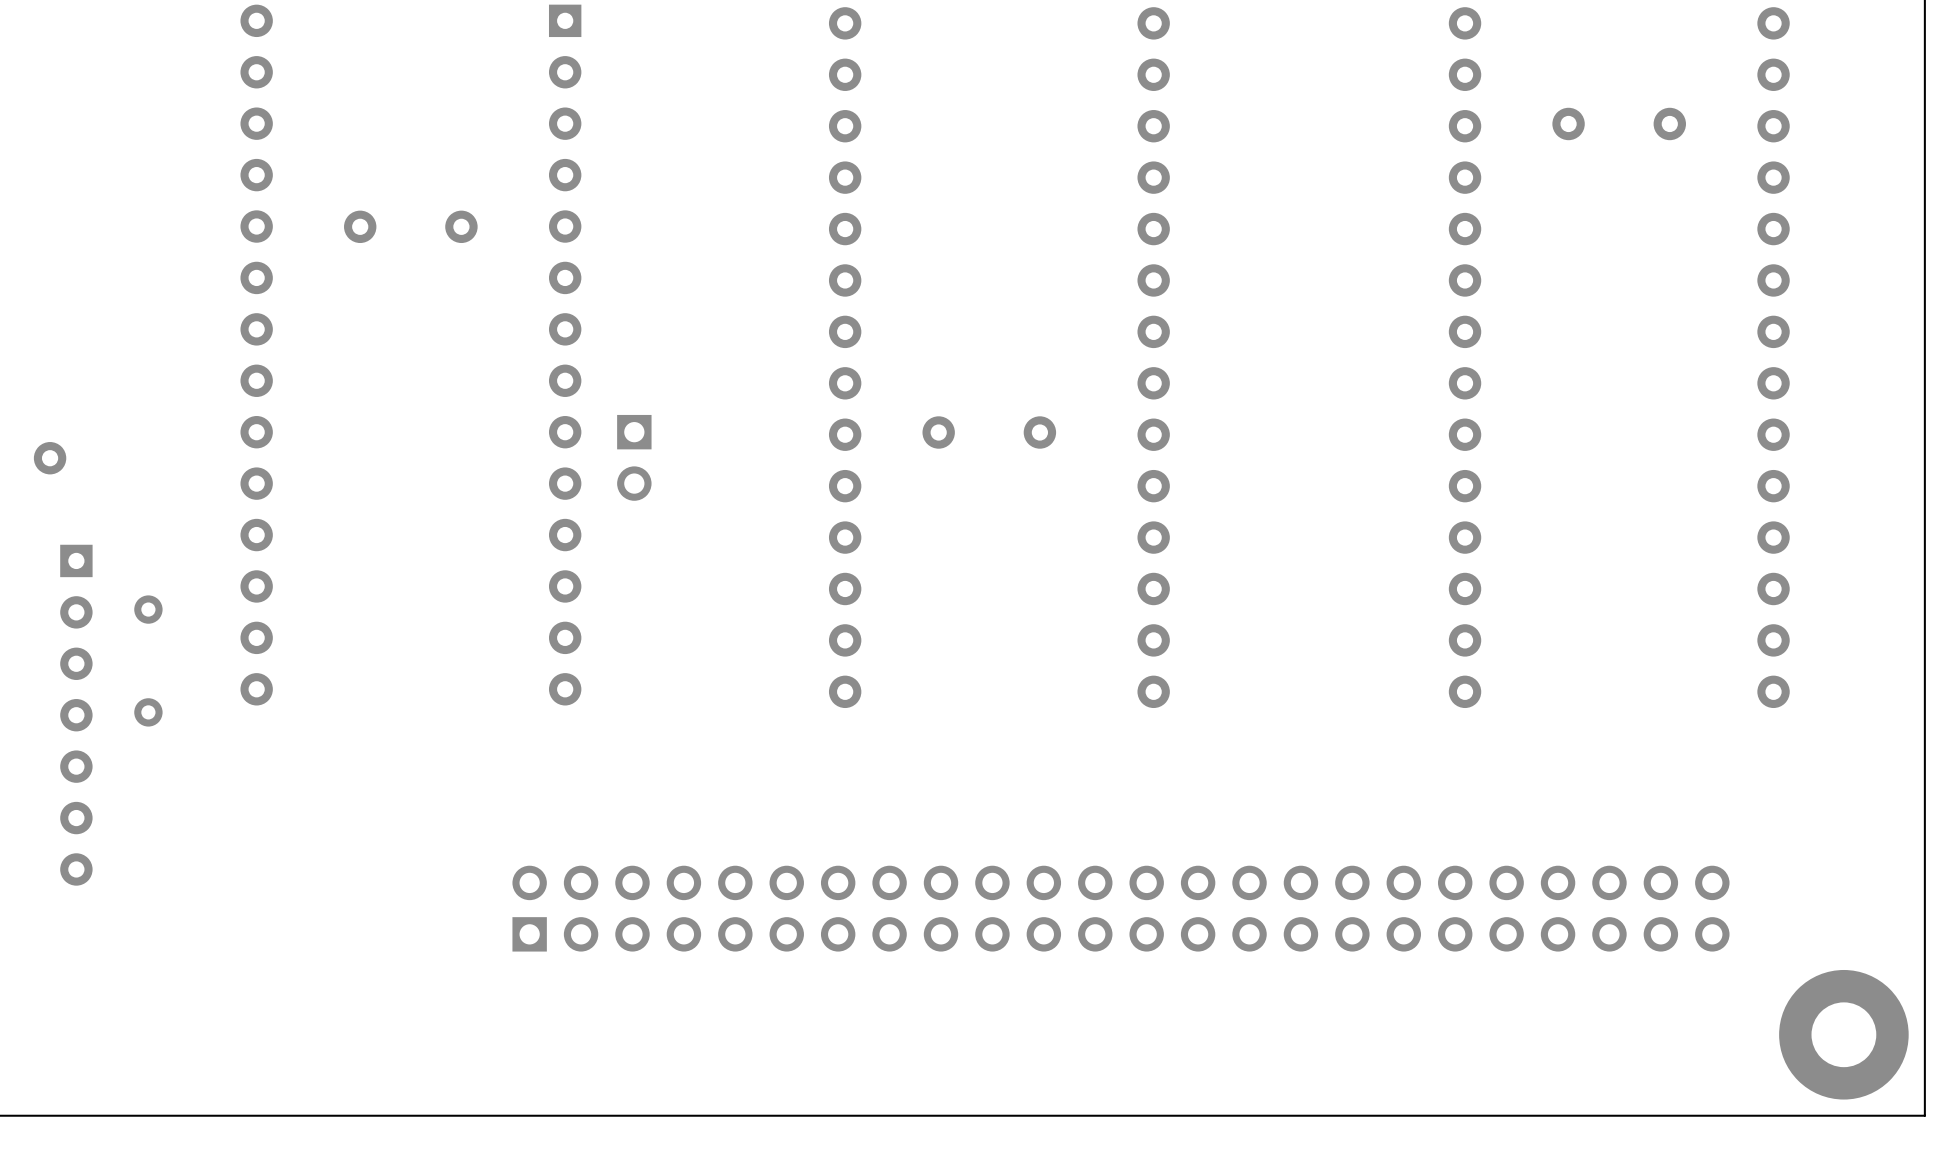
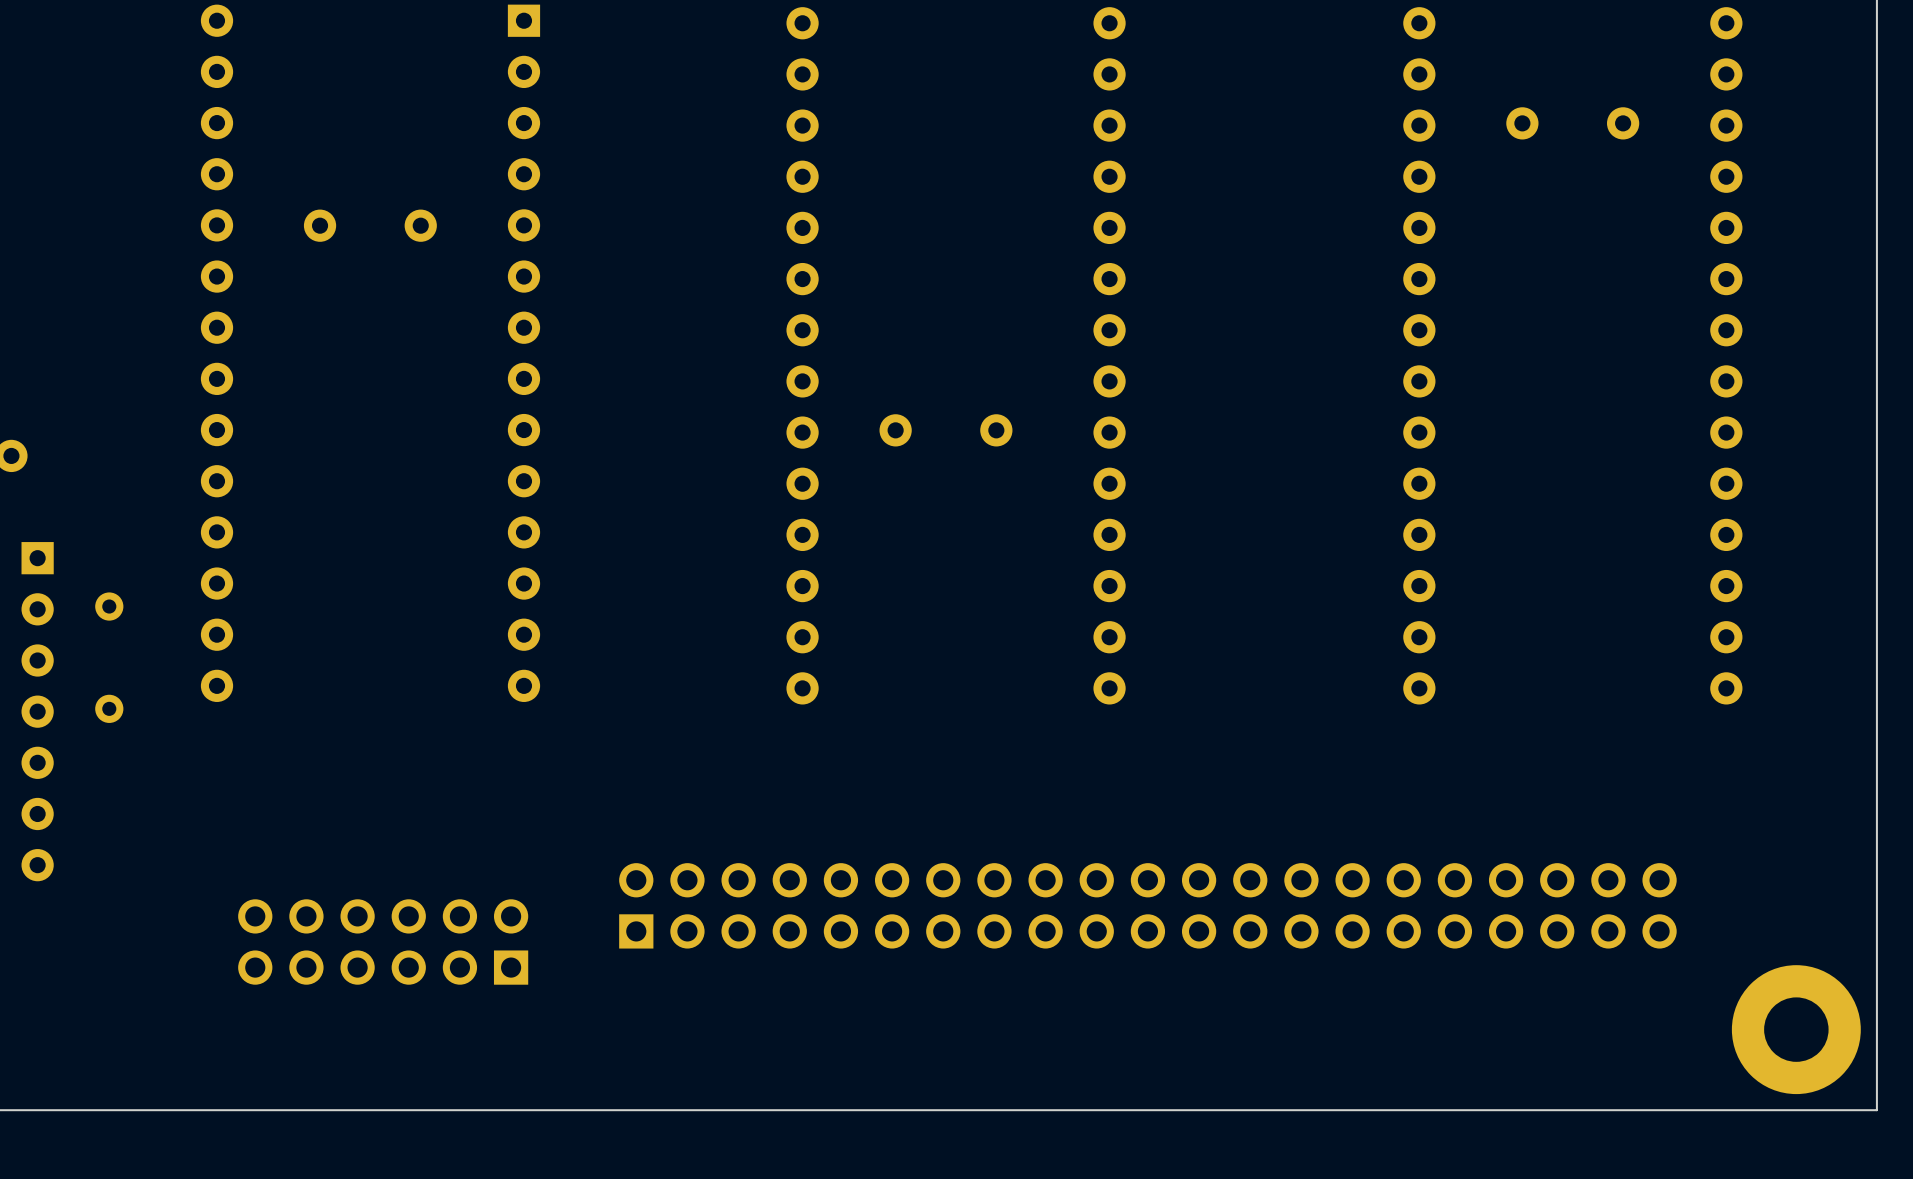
part: (634, 457) -> none
part: (1120, 908) -> none
part: none -> (1147, 905)
part: none -> (383, 942)

